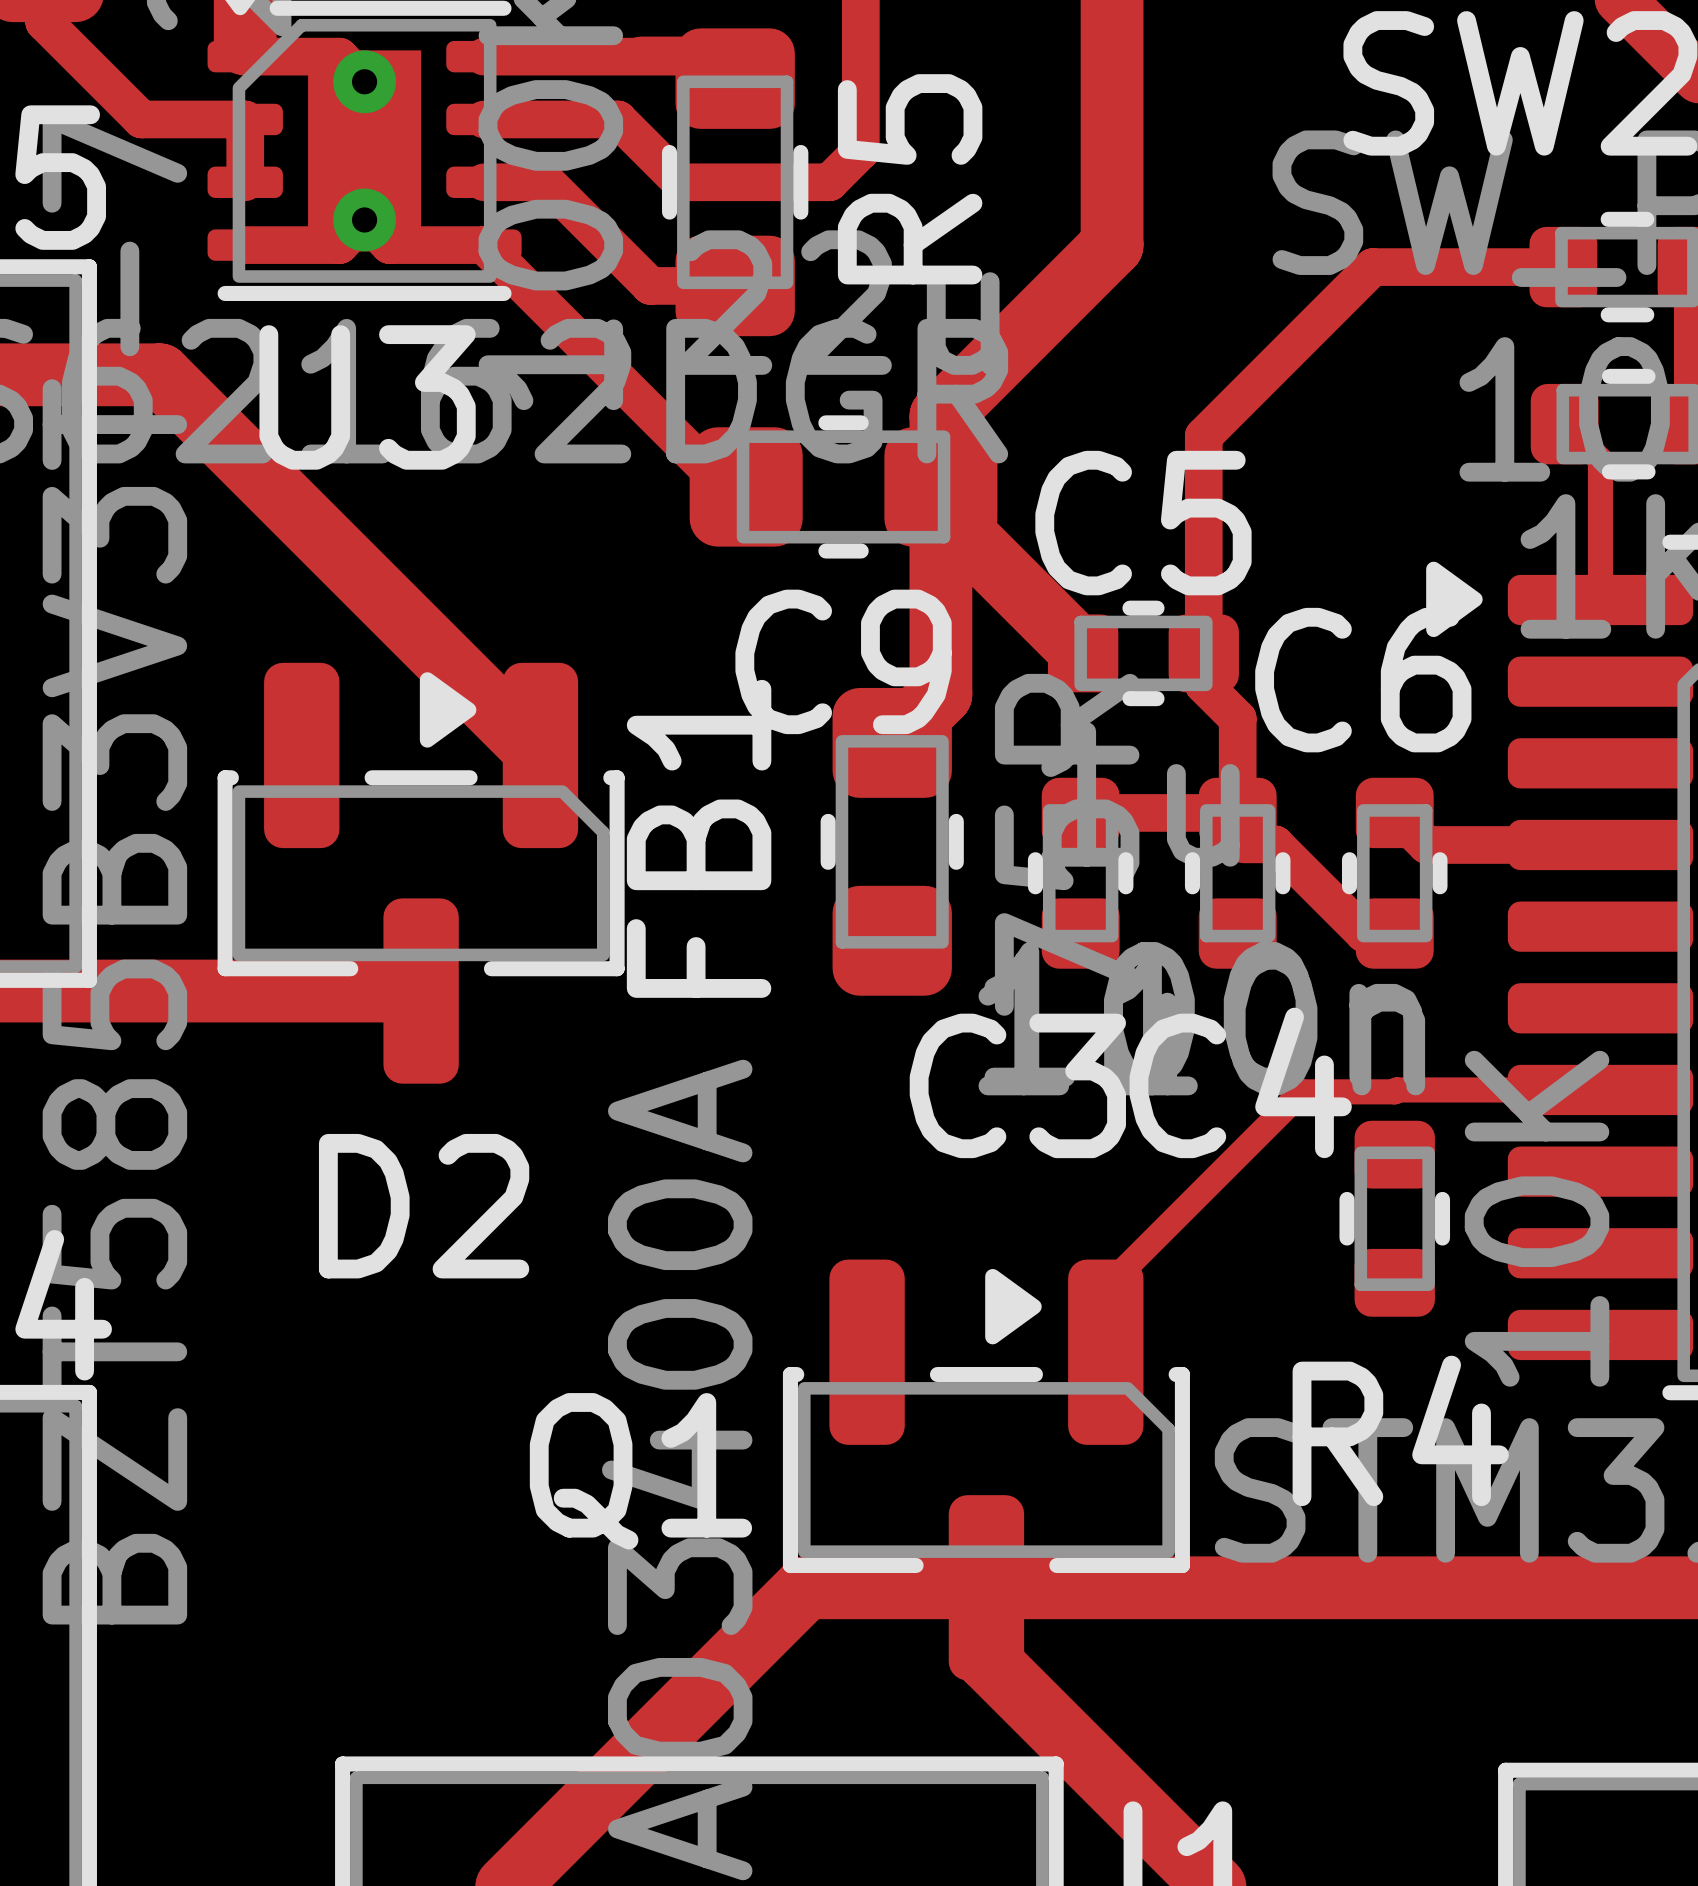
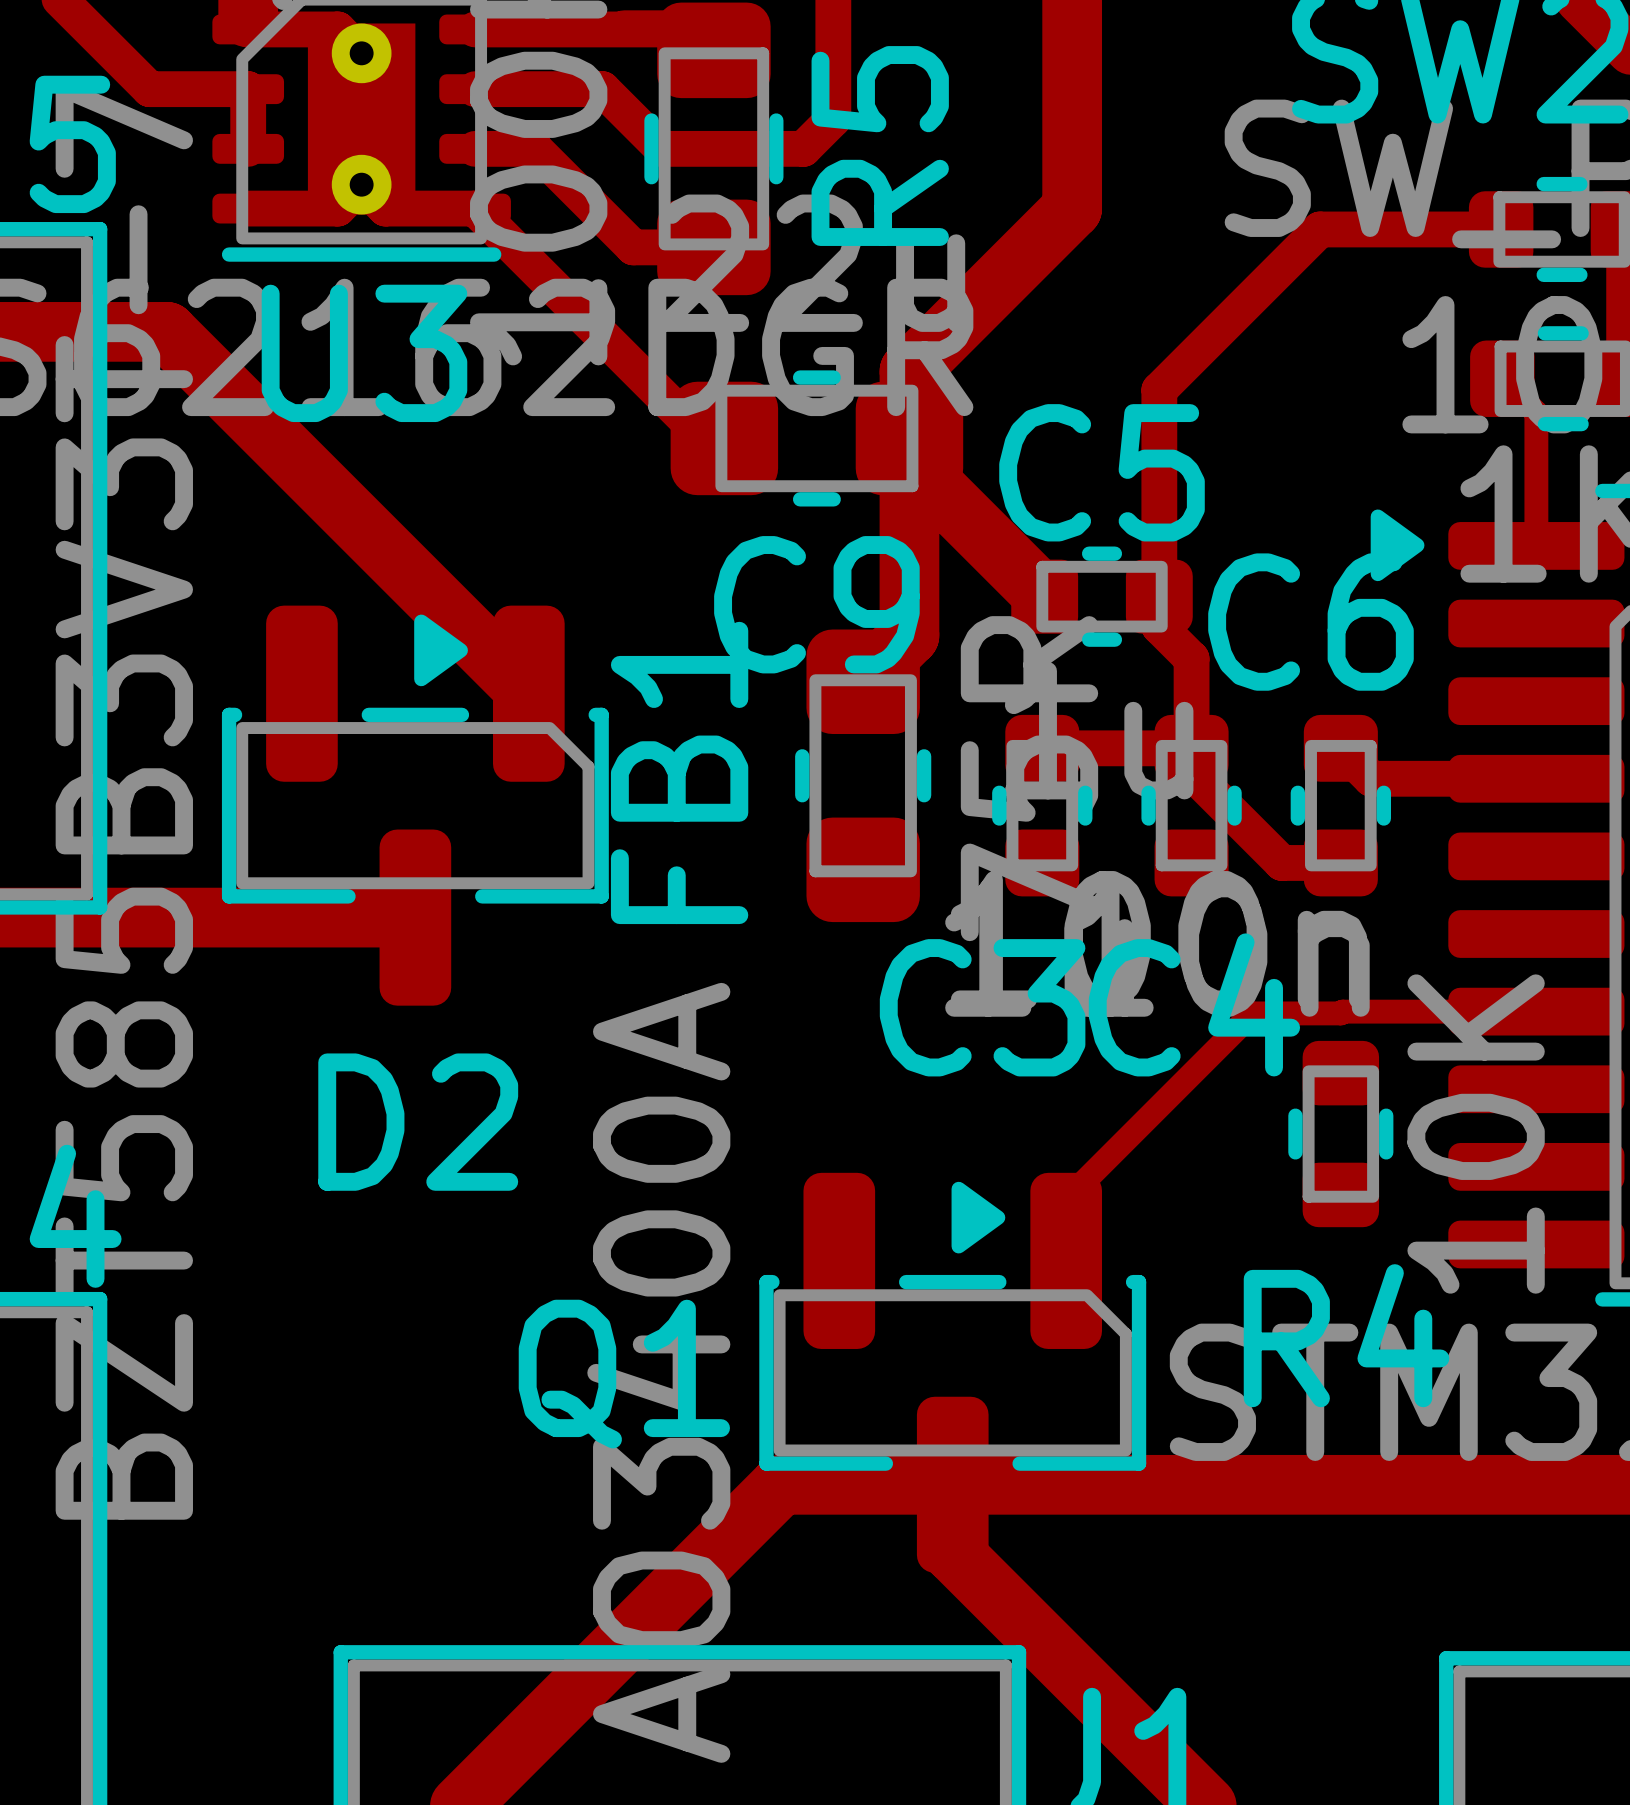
track: (1243, 844) (1275, 844) (1364, 933) -> (1191, 778) (1197, 778) (1281, 862) (1311, 862)

